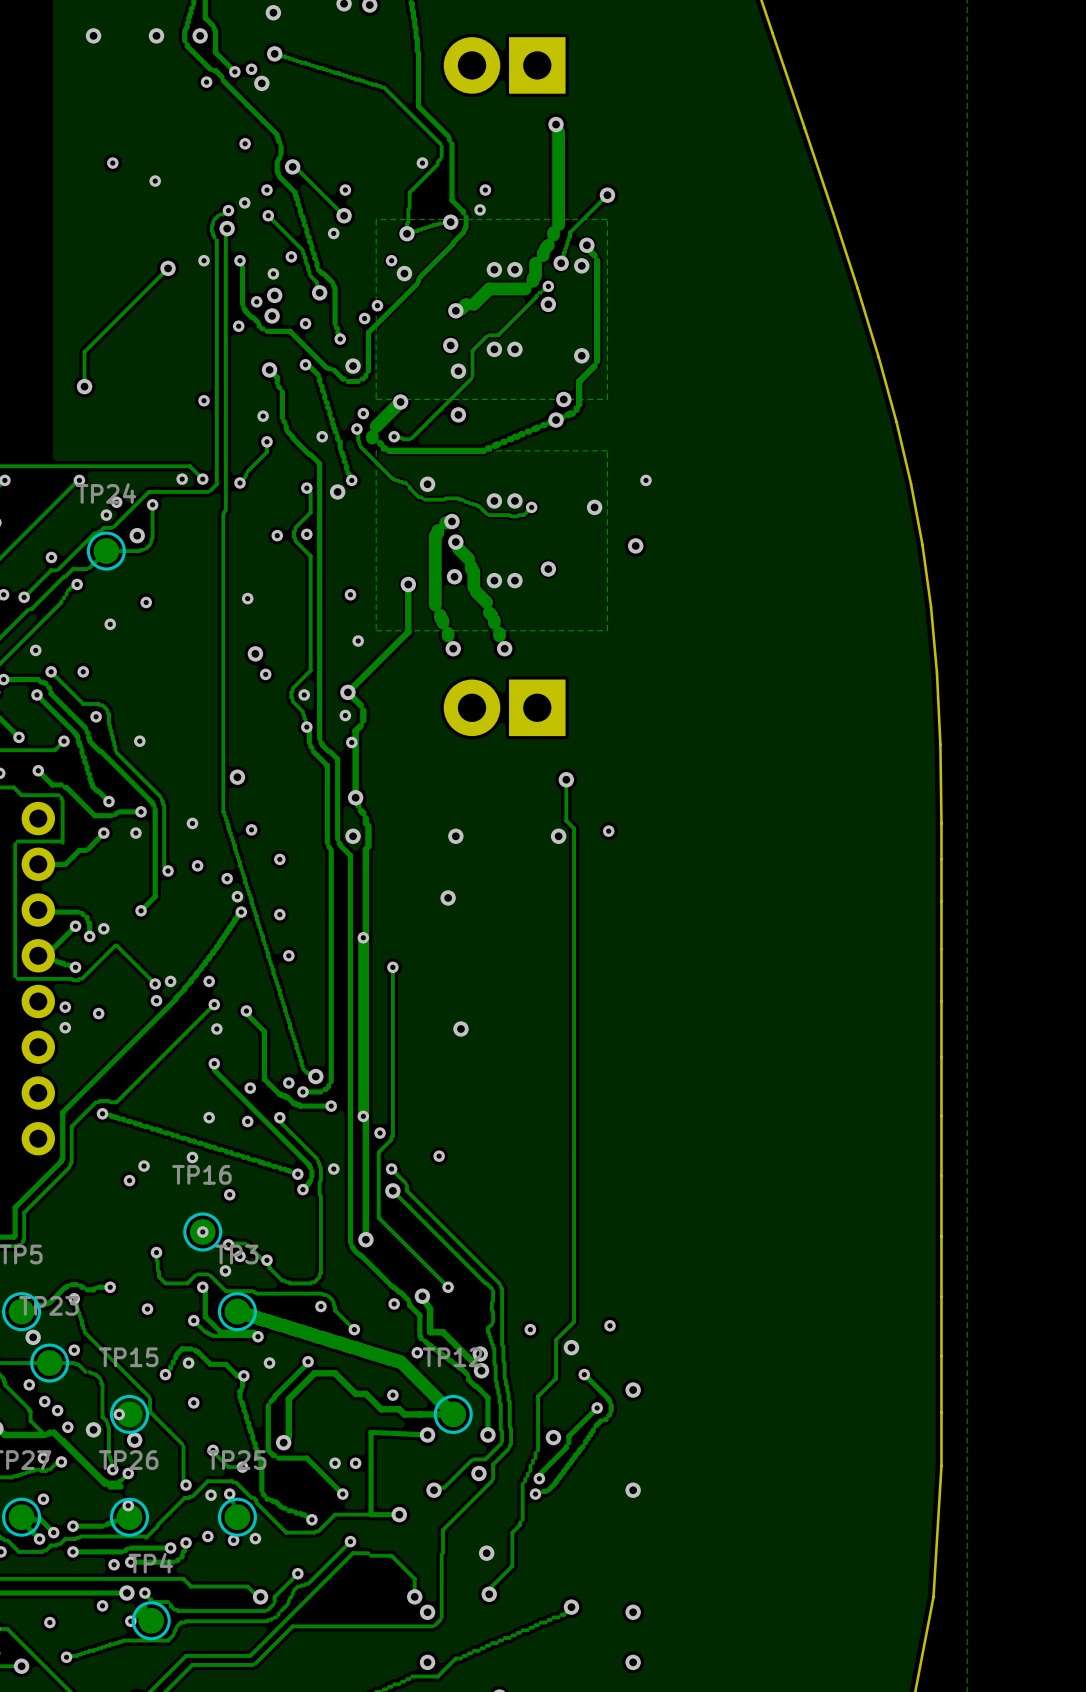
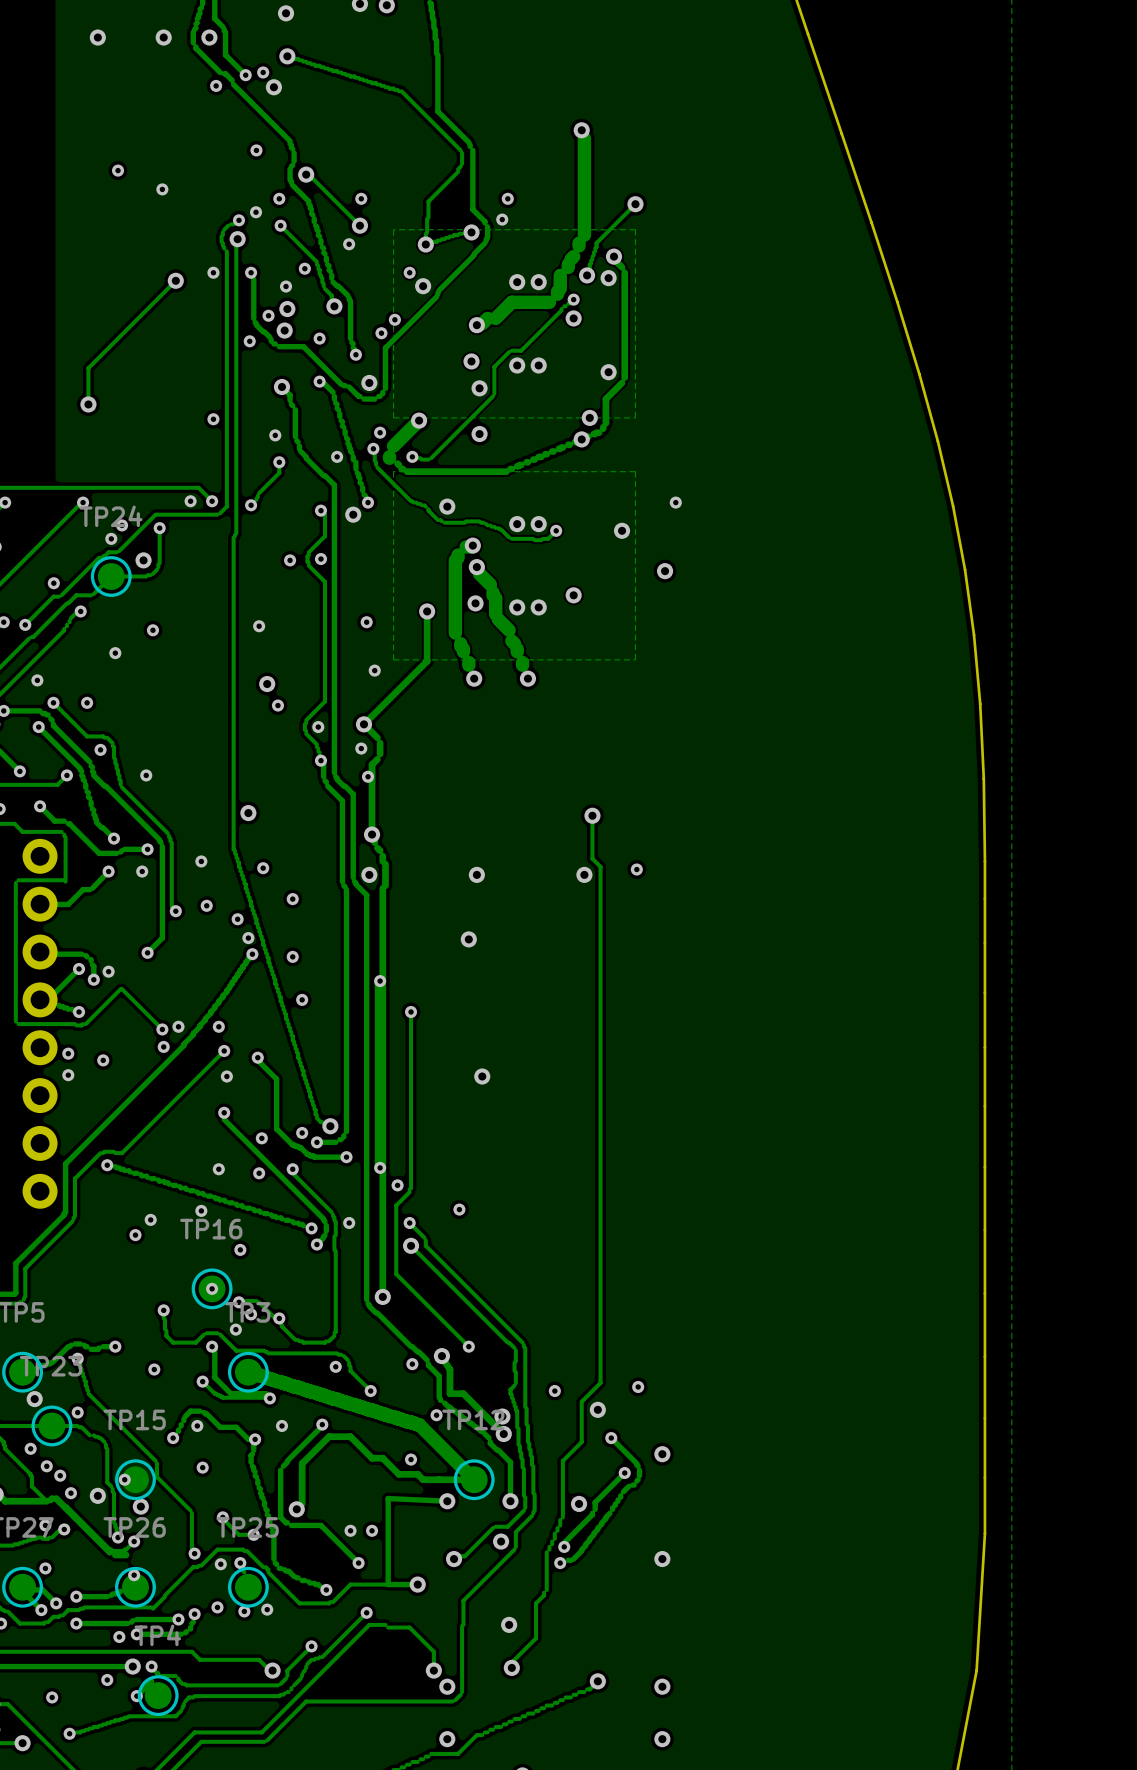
part: (504, 65) -> none
via: (422, 163) -> none
part: (504, 707) -> none

